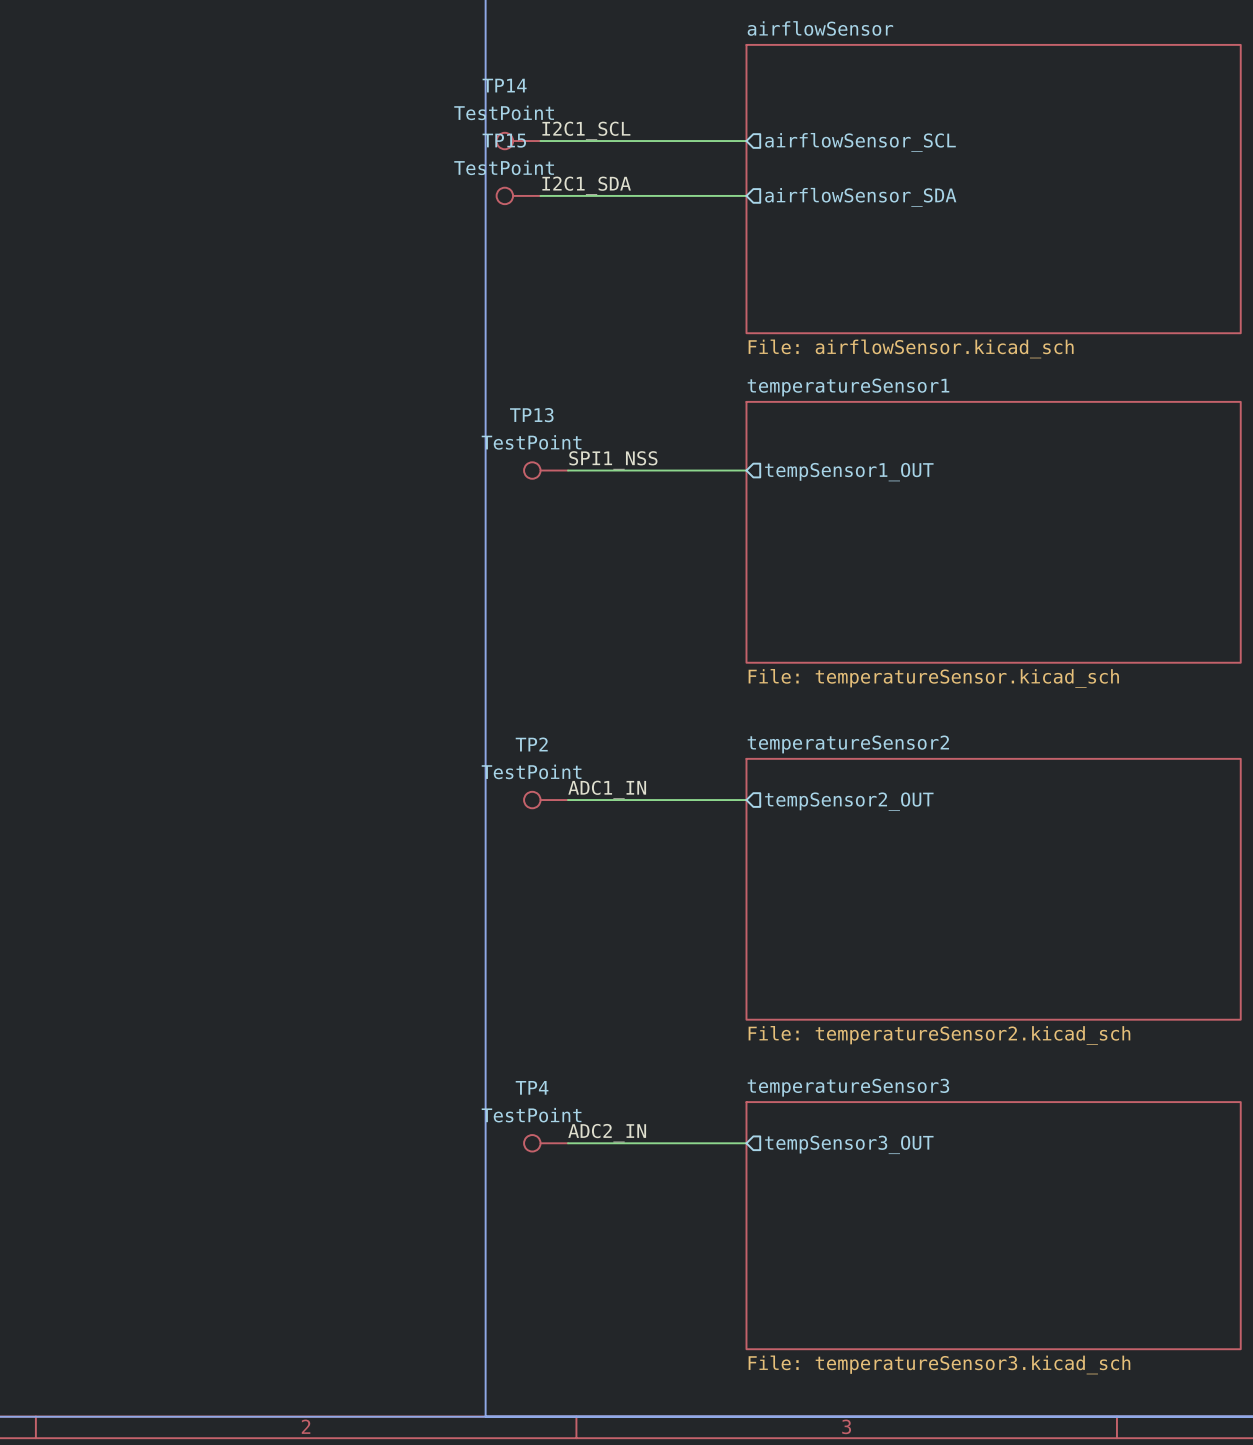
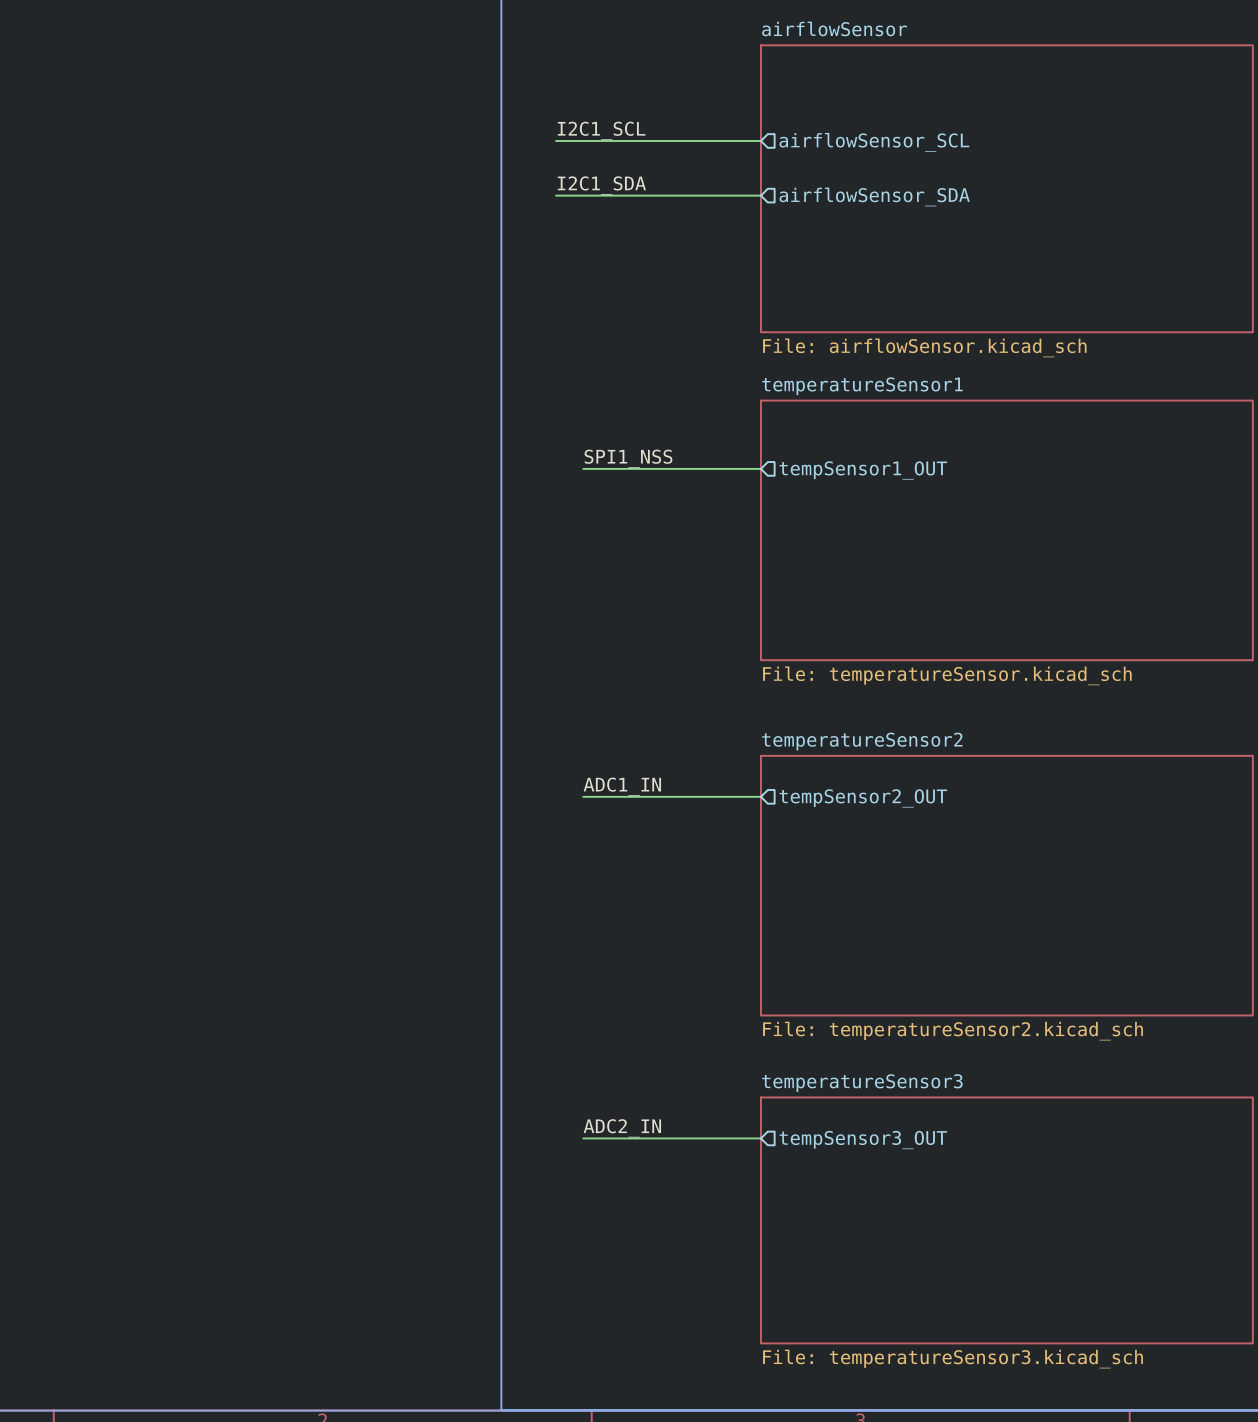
TP14: TestPoint (518, 141) -> none
TP15: TestPoint (518, 195) -> none
TP13: TestPoint (546, 470) -> none
TP2: TestPoint (546, 800) -> none
TP4: TestPoint (546, 1143) -> none

